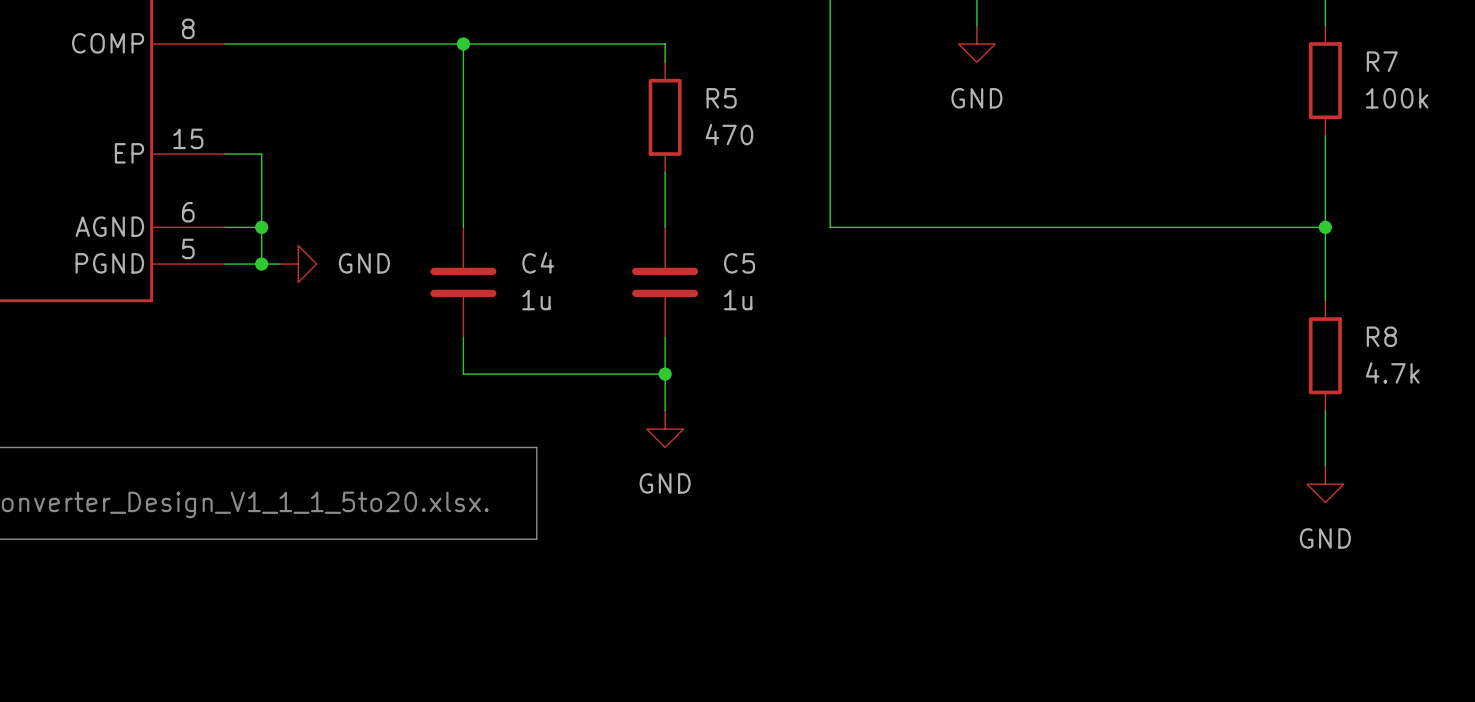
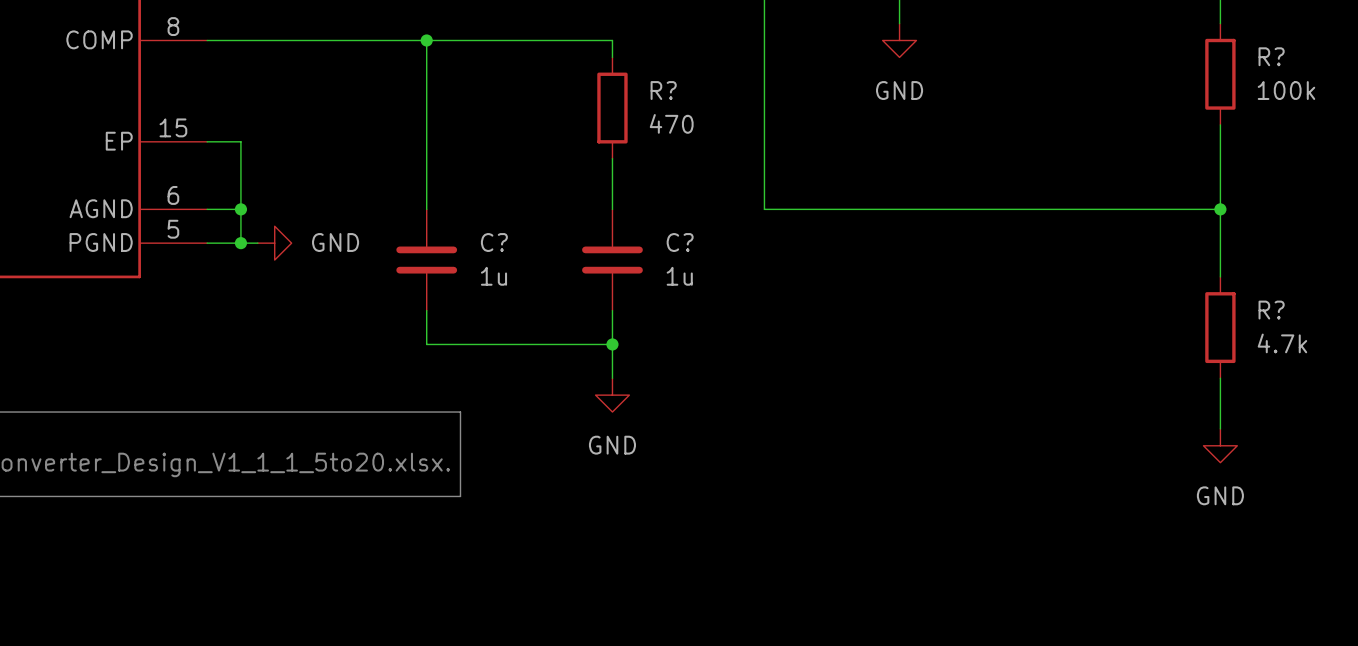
R7 name: R7 (1382, 61) -> R? (1271, 56)
R5 name: R5 (721, 98) -> R? (663, 90)
C4 name: C4 (538, 262) -> C? (494, 242)
C5 name: C5 (739, 263) -> C? (680, 242)
R8 name: R8 (1381, 336) -> R? (1271, 310)
line: (500, 447) (536, 447) (536, 539) (500, 539) -> (460, 412) (460, 496)

